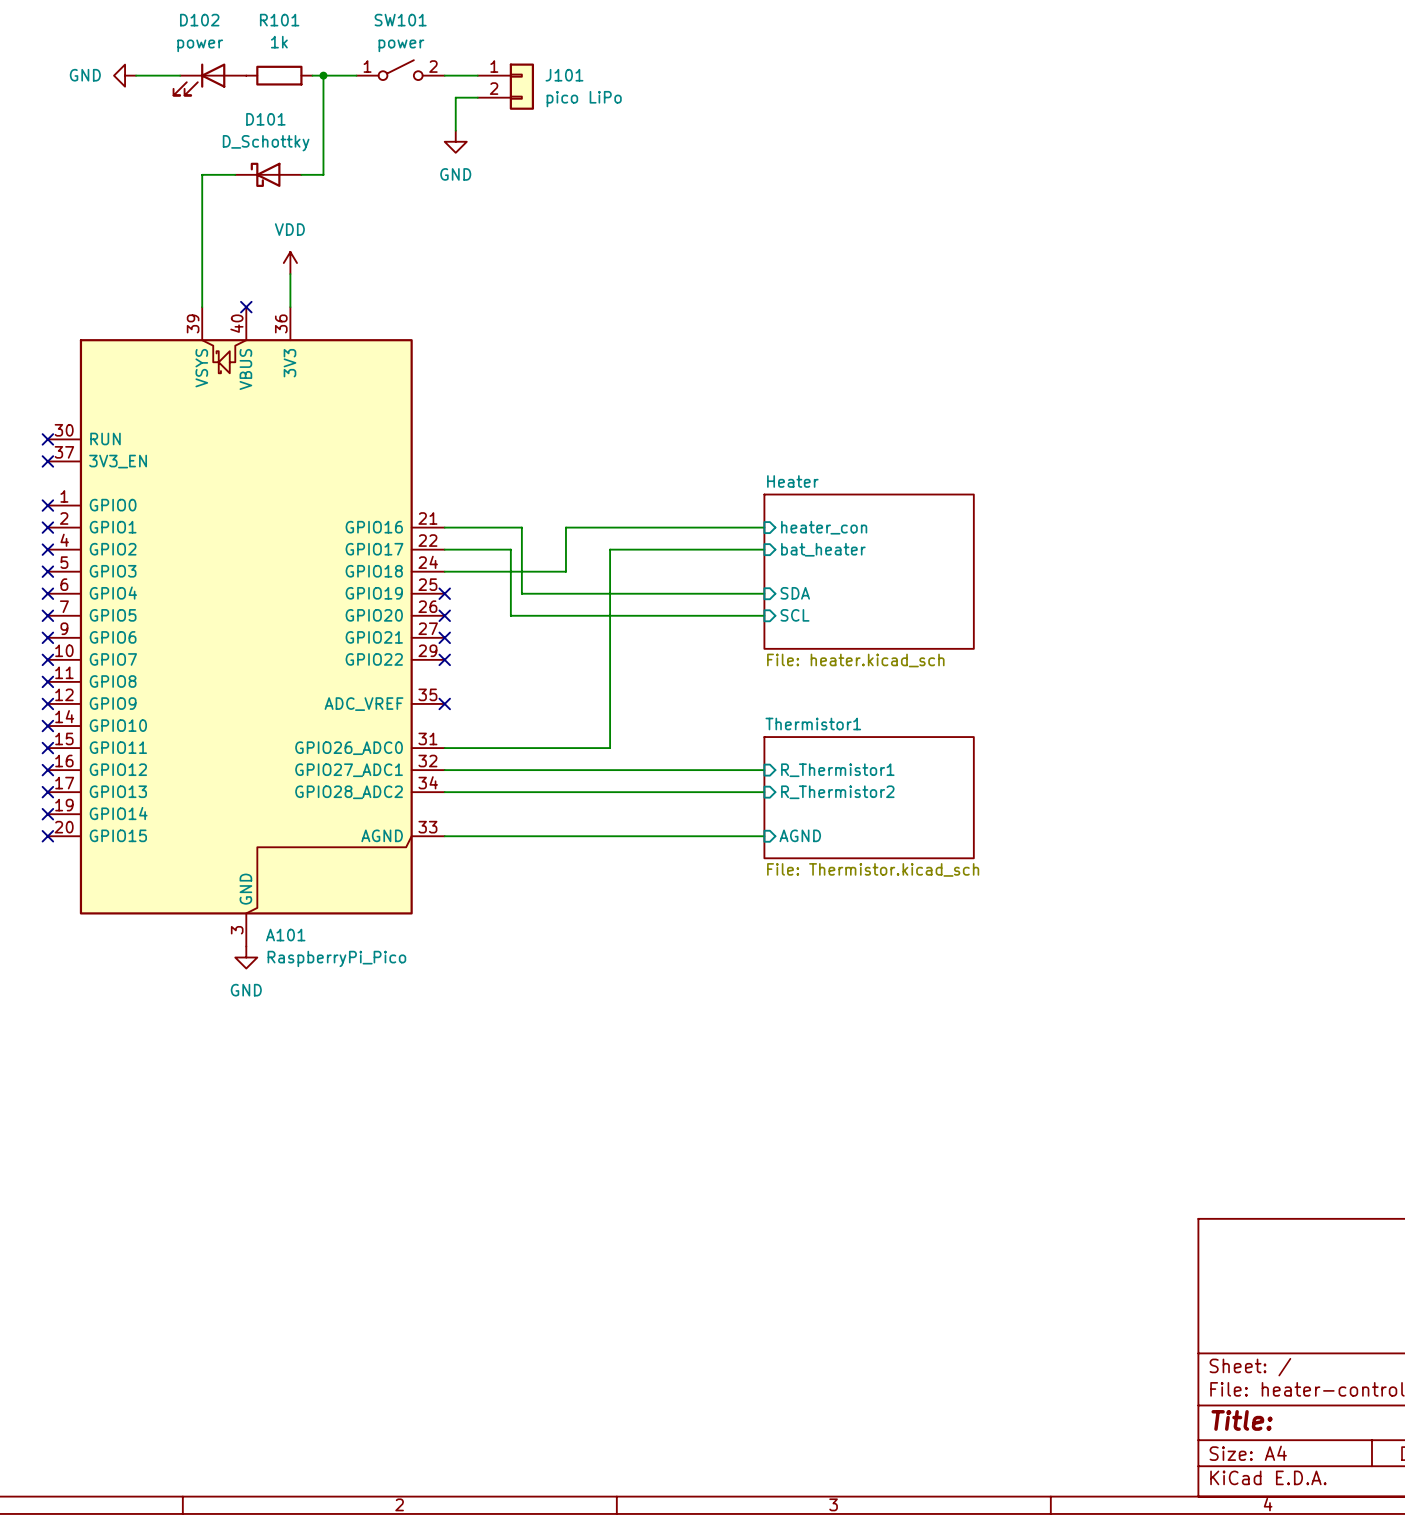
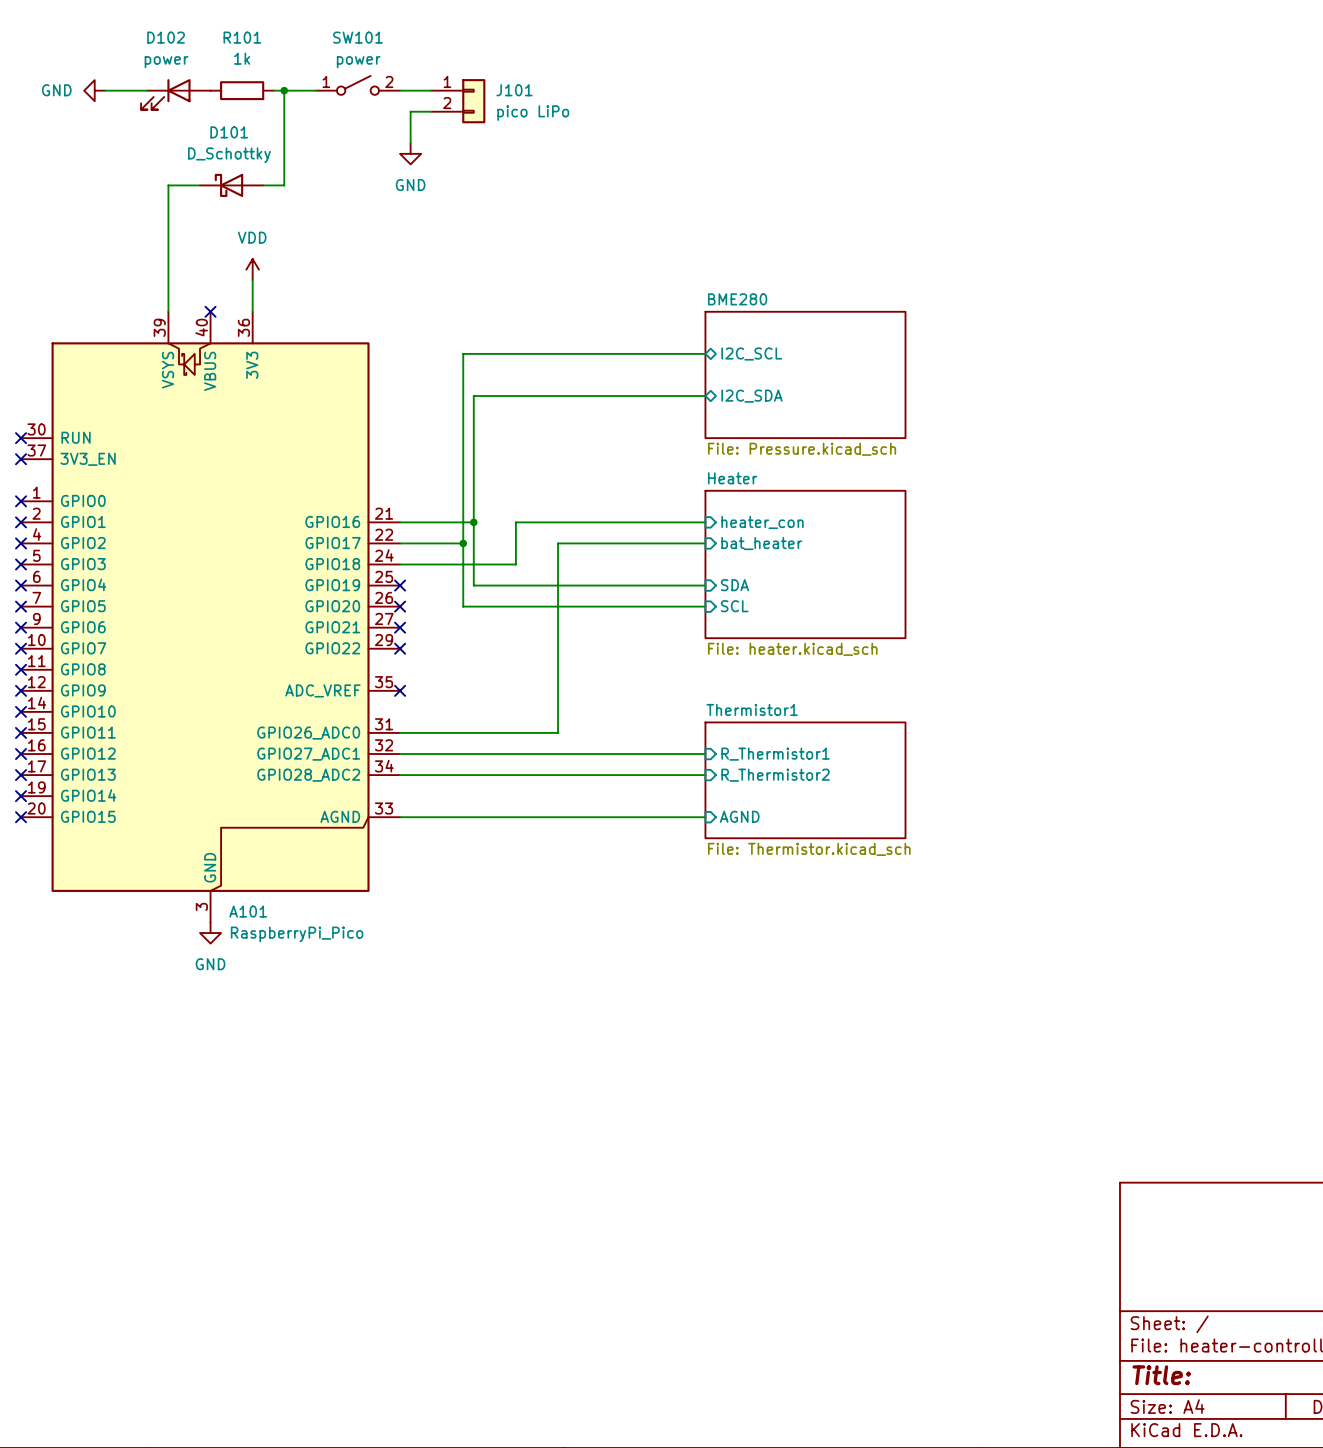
wire: none -> (705, 353) (463, 353) (463, 543)
sheet pin: none -> I2C_SCL (751, 354)
sheet BME280: none -> File: Pressure.kicad_sch (805, 374)
wire: none -> (705, 396) (473, 396) (473, 522)
sheet pin: none -> I2C_SDA (751, 396)
junction: none -> (473, 522)
junction: none -> (463, 543)

